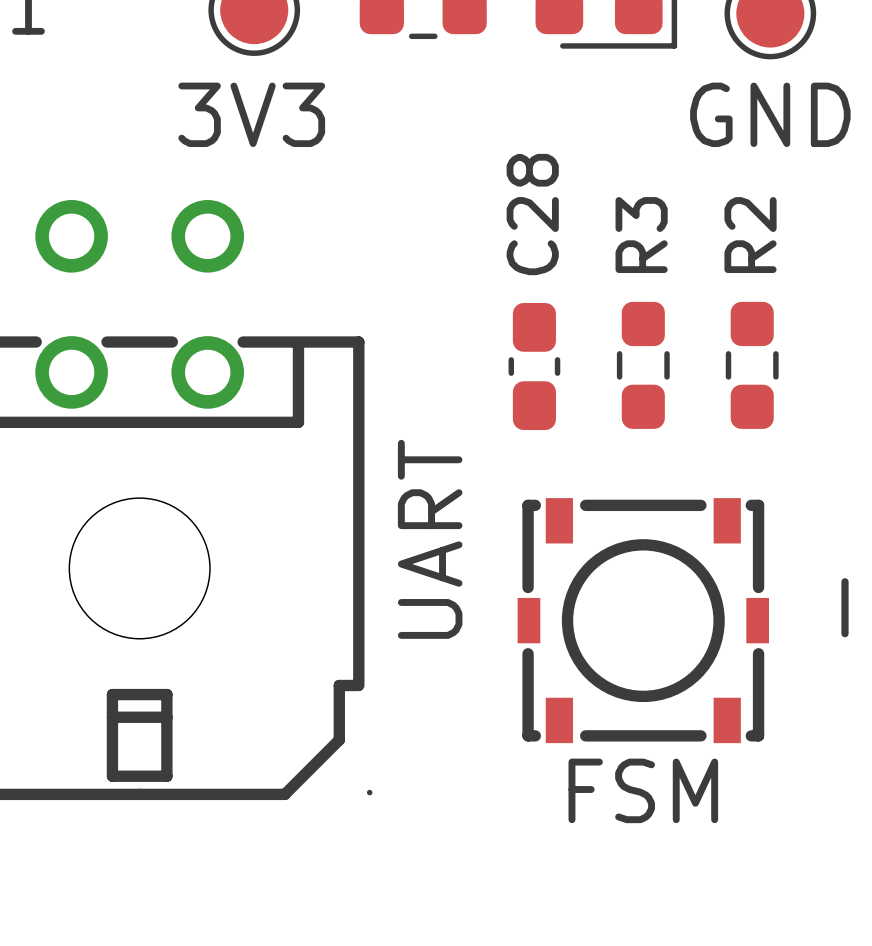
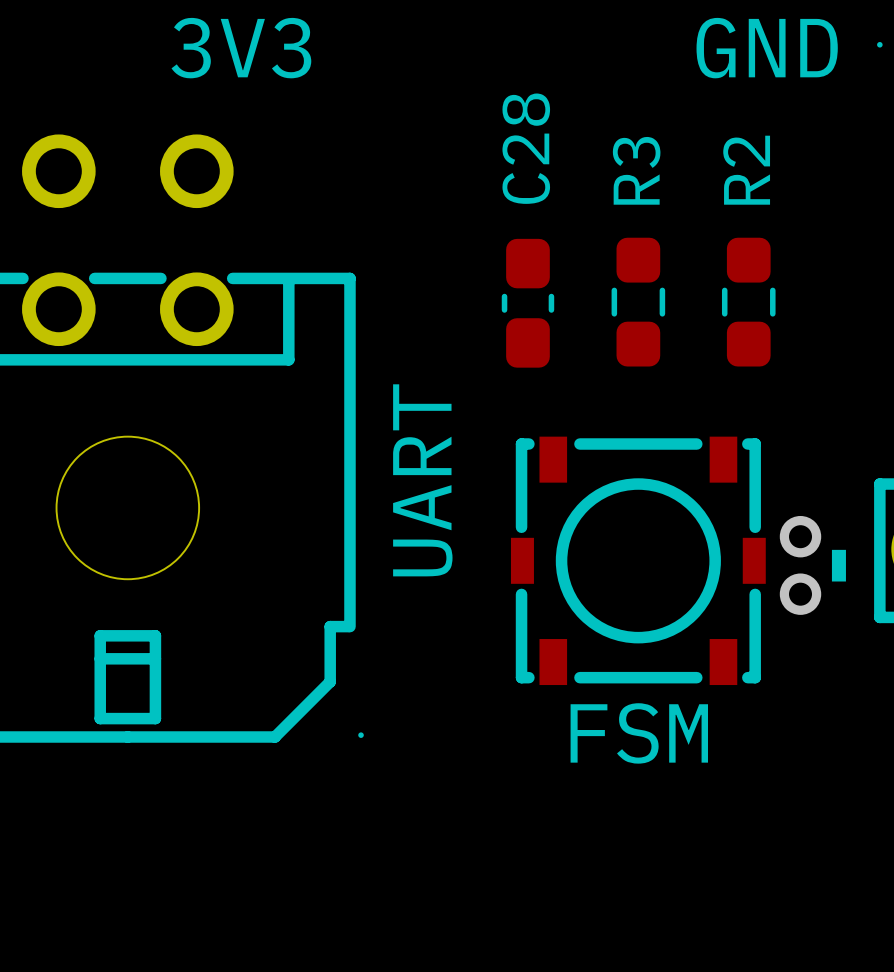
via: none -> (800, 536)
via: none -> (800, 594)

